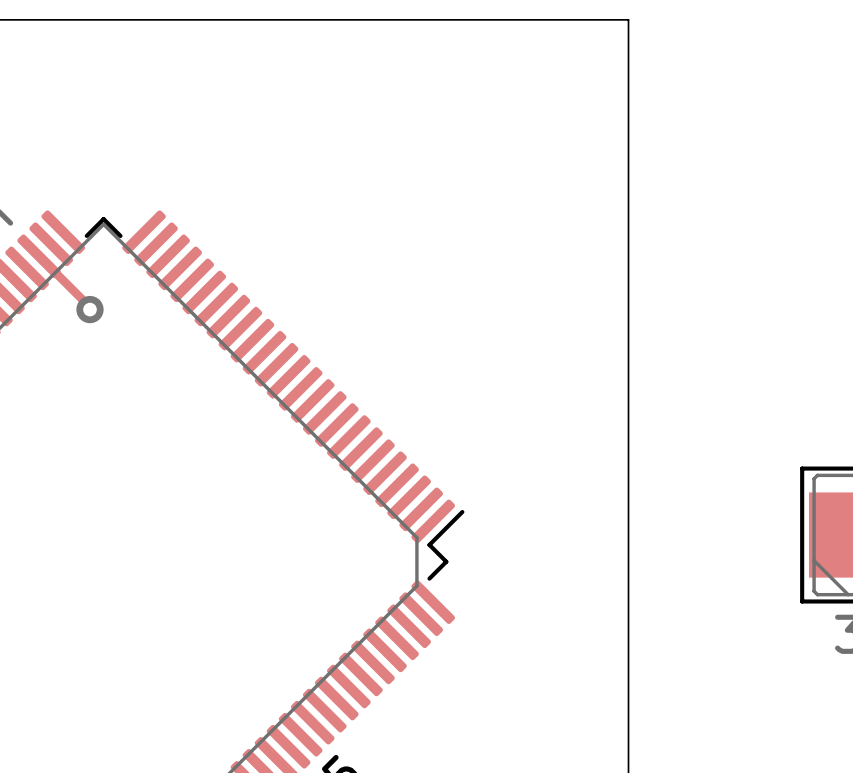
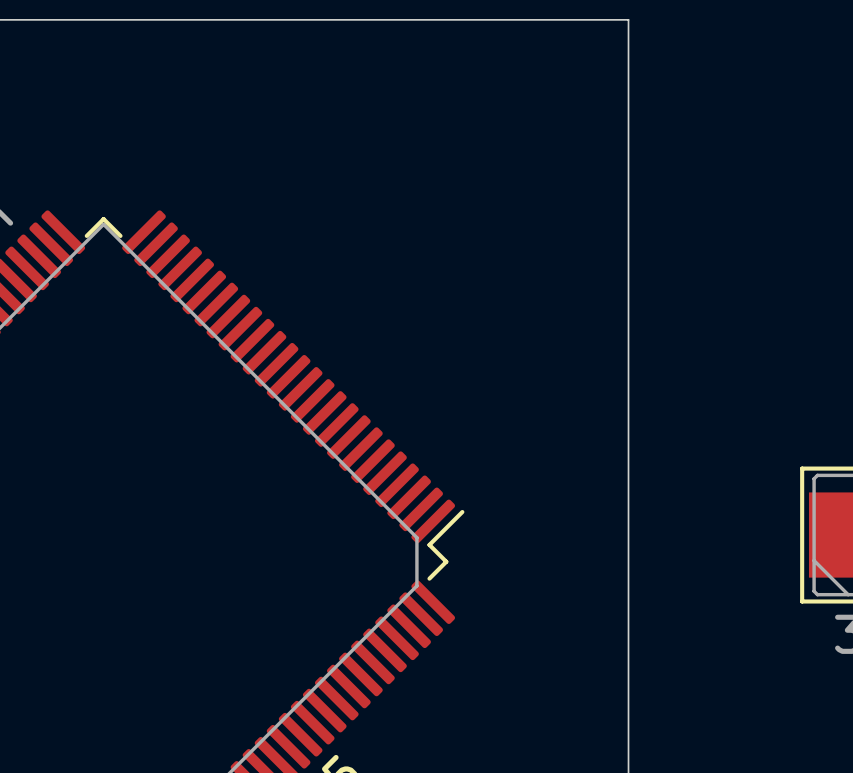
track: (39, 256) (90, 307) (90, 309) -> none
via: (90, 309) -> none

